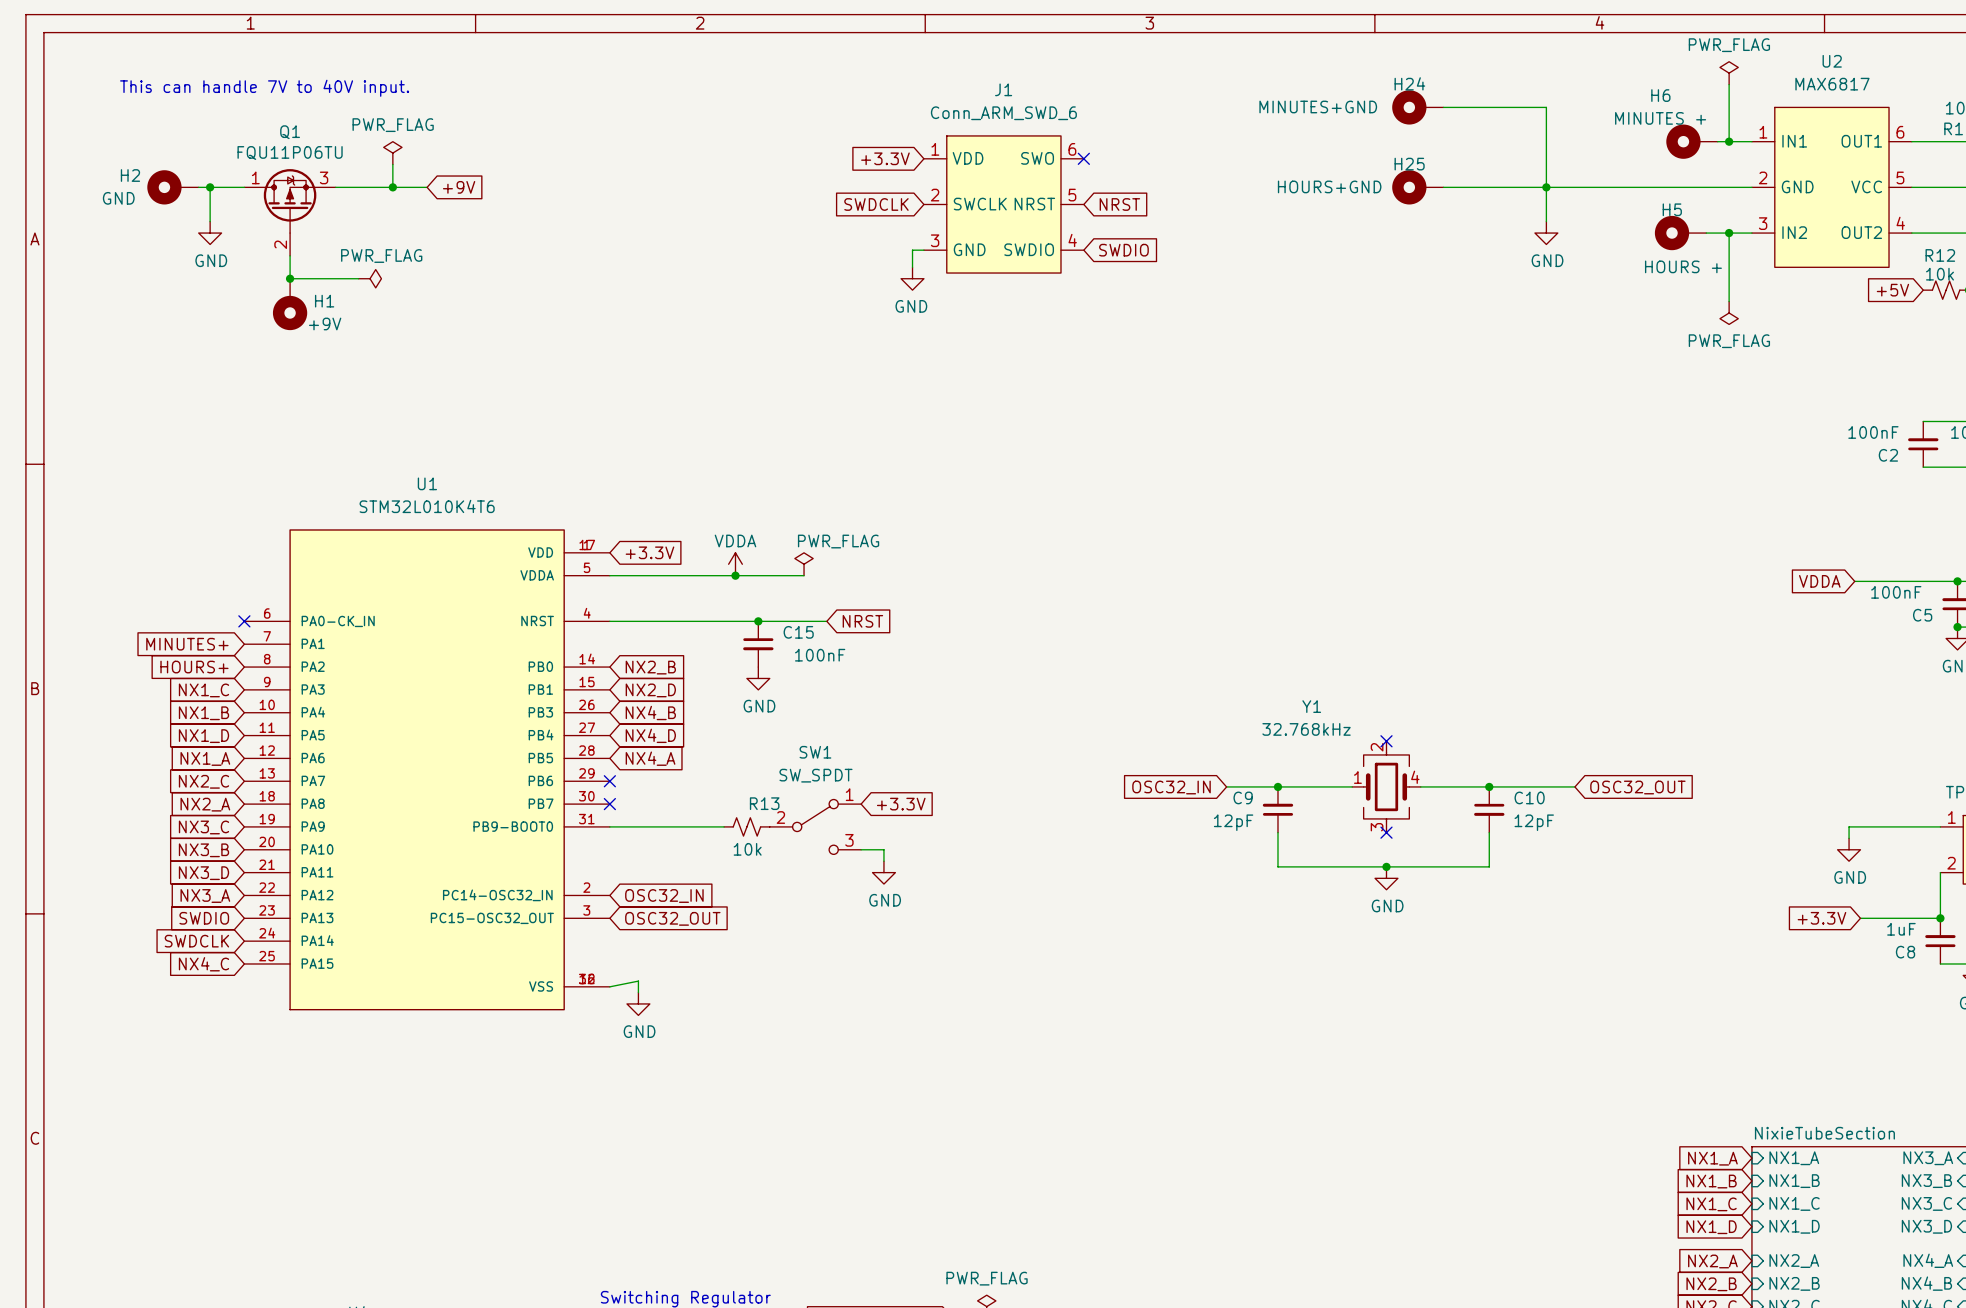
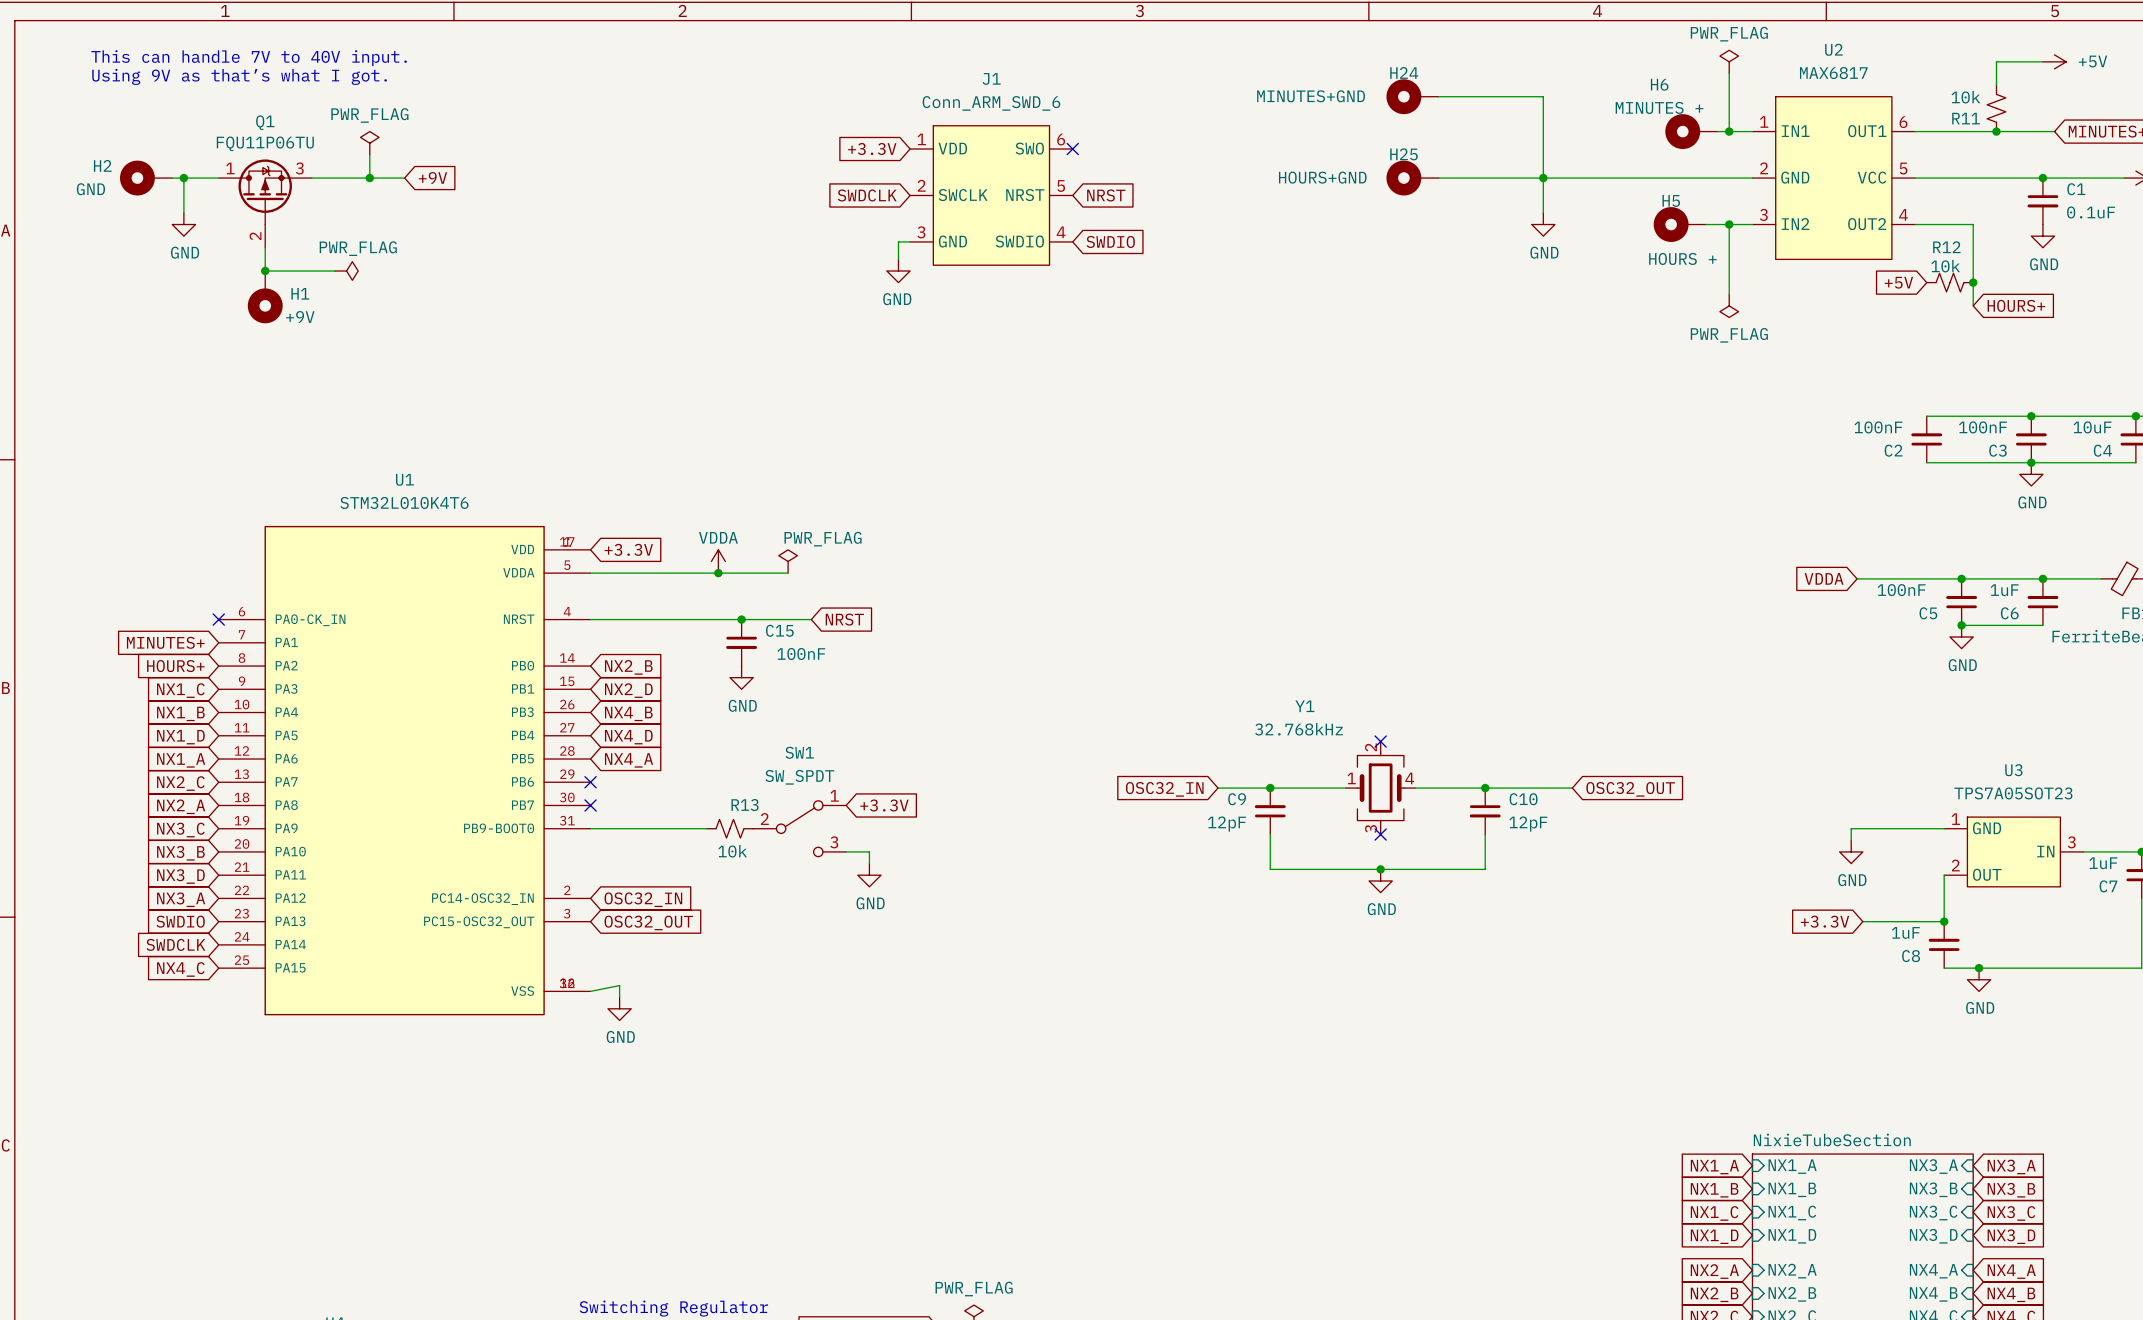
text: none -> This can handle 7V to 40V input. (249, 58)
text: This can handle 7V to 40V input. (264, 88) -> Using 9V as that’s what I got. (239, 76)

